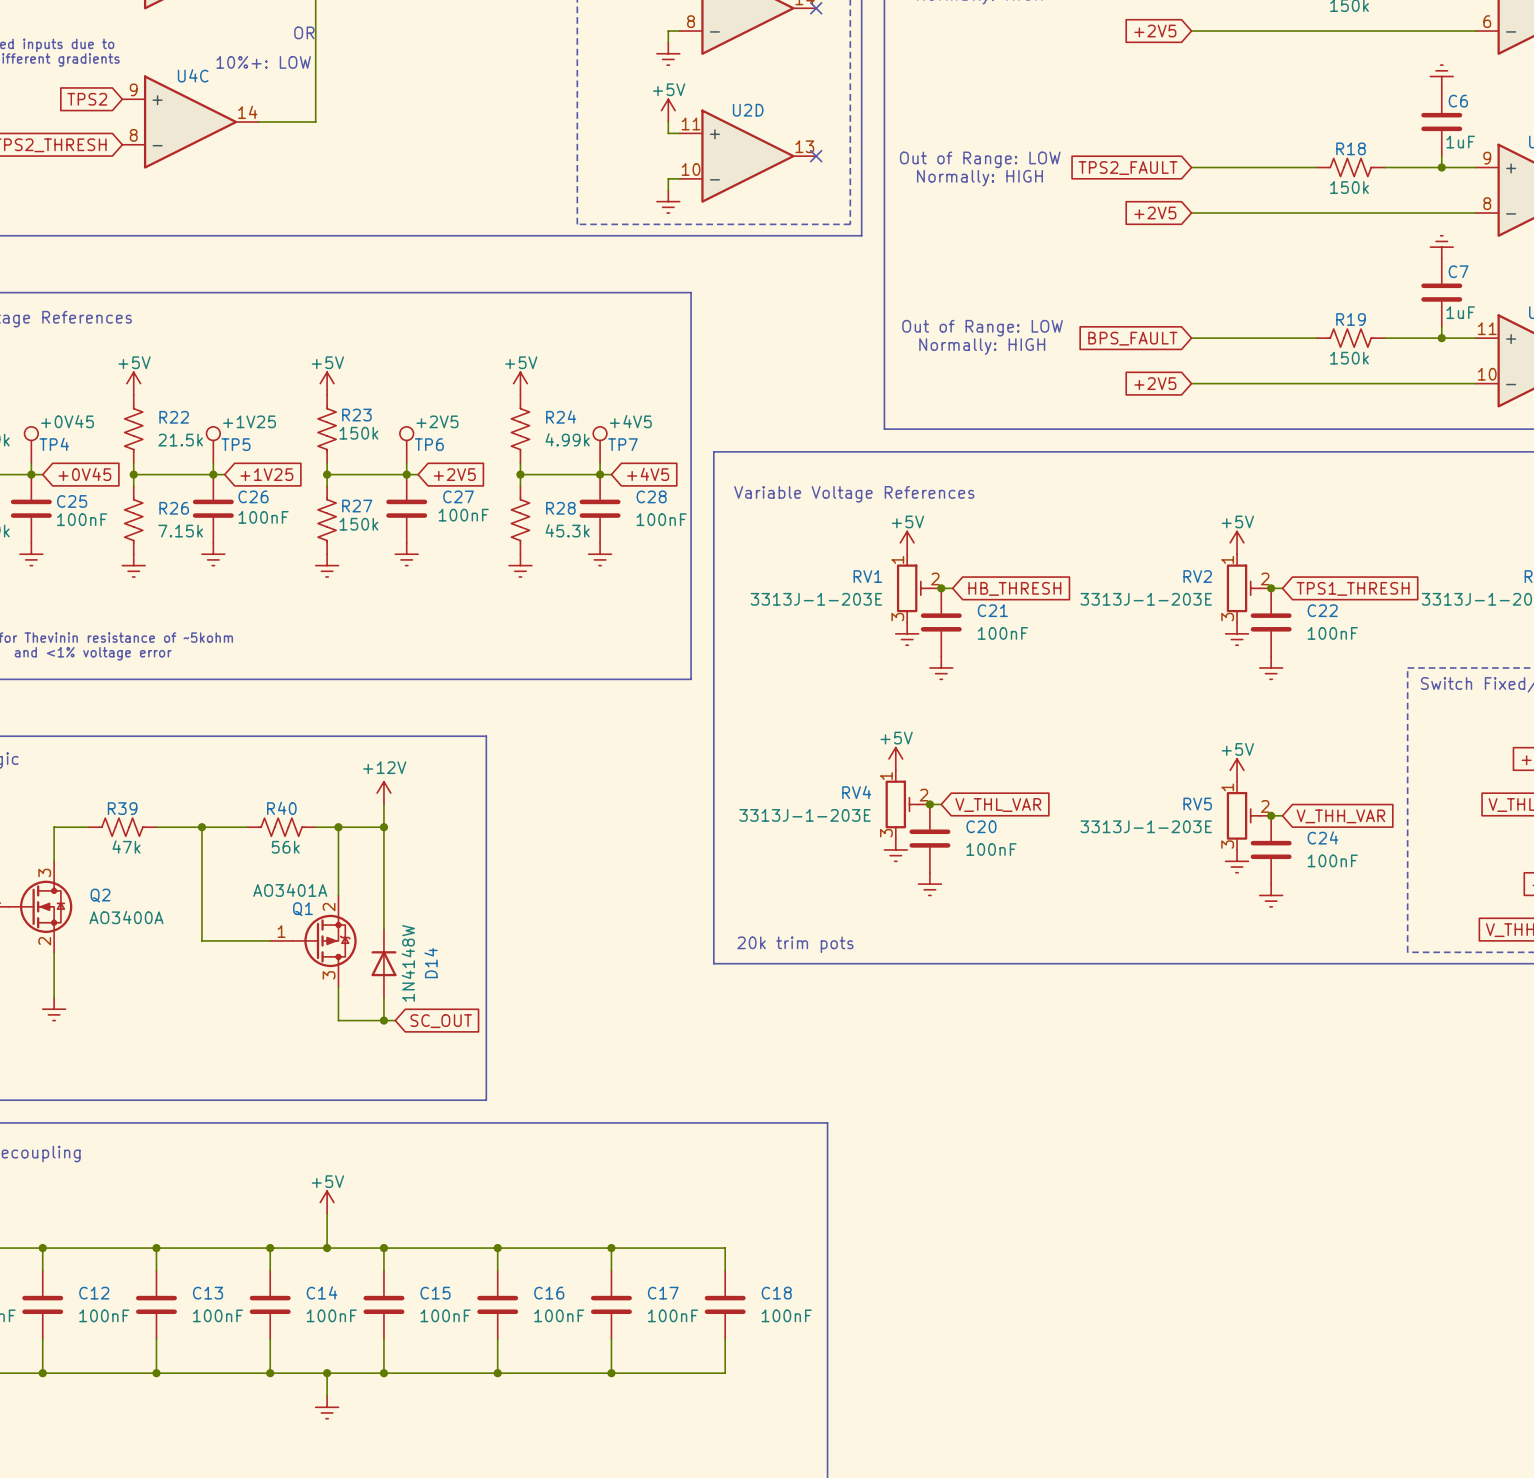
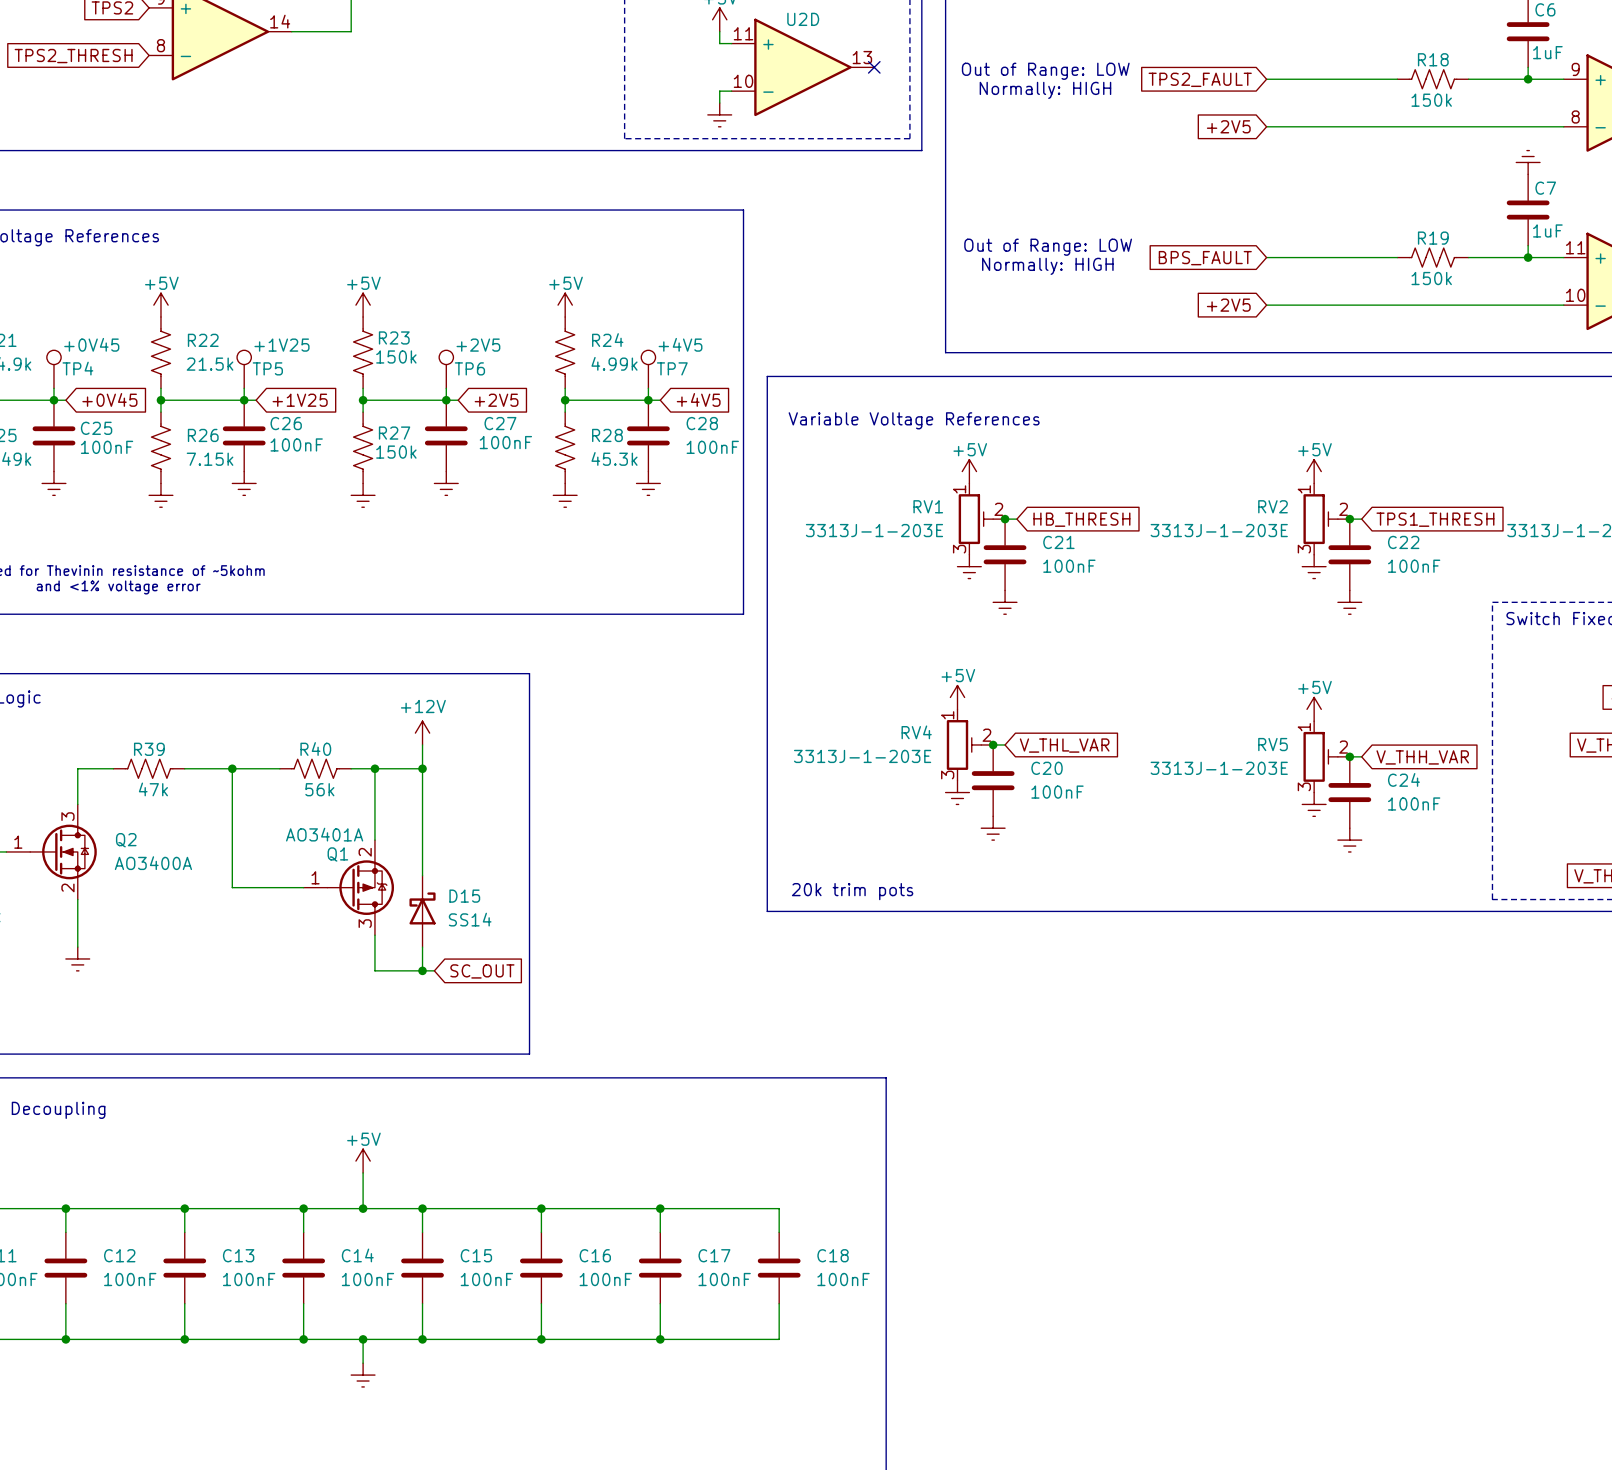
D14: 1N4148W (383, 963) -> none
D15: none -> SS14 (422, 911)

